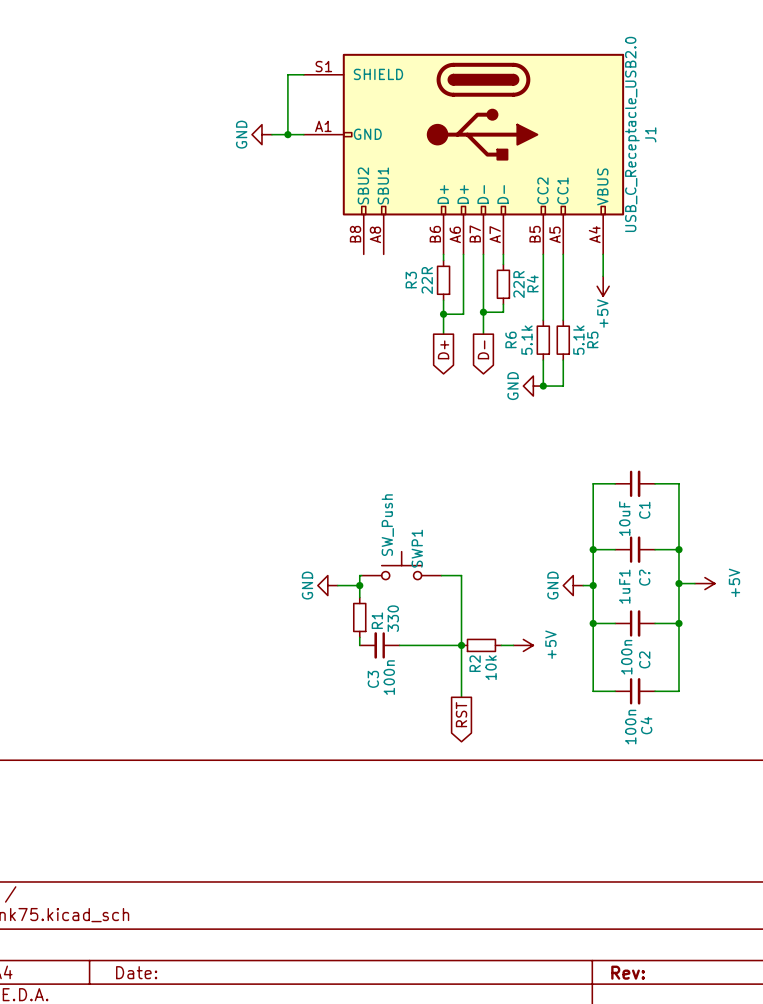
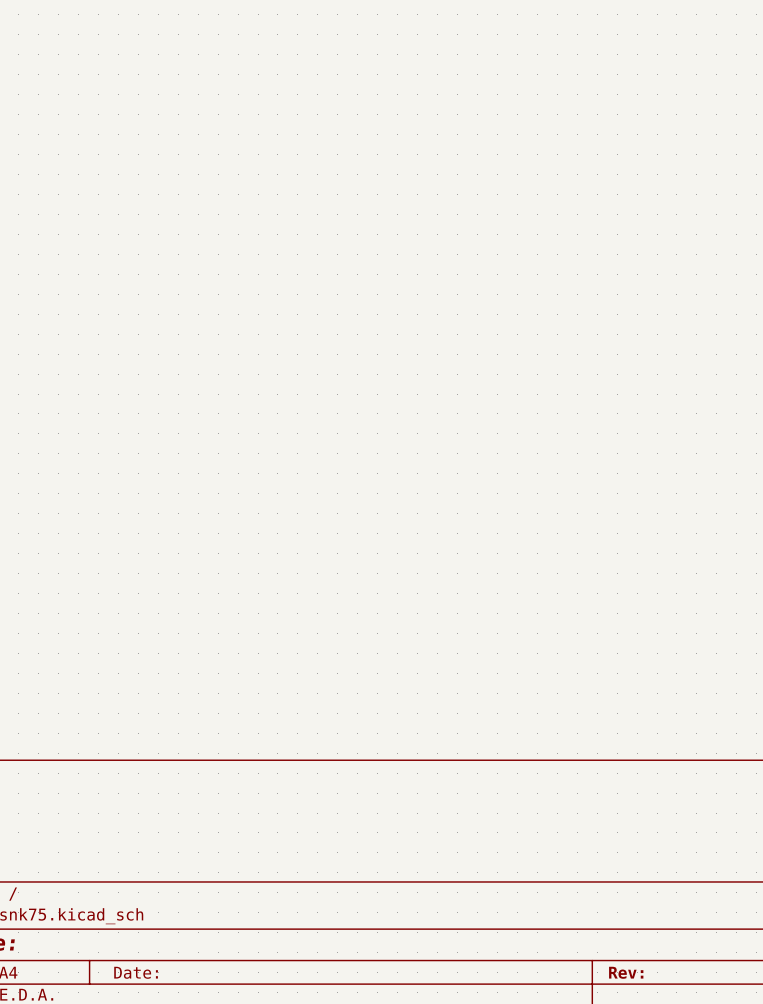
wire: (303, 74) (287, 74) (287, 134) -> none
power symbol: GND (261, 134) -> none
wire: (271, 134) (303, 134) -> none
junction: (287, 134) -> none
J1: USB_C_Receptacle_USB2.0 (464, 154) -> none
wire: (443, 254) (443, 260) -> none
wire: (463, 254) (463, 314) (443, 314) -> none
wire: (483, 254) (483, 334) -> none
wire: (503, 254) (503, 264) -> none
wire: (543, 254) (543, 320) -> none
wire: (563, 254) (563, 320) -> none
wire: (603, 254) (603, 276) -> none
R3: 22R (443, 280) -> none
R4: 22R (503, 284) -> none
power symbol: +5V (603, 286) -> none
wire: (443, 300) (443, 334) -> none
wire: (503, 304) (503, 312) (483, 312) -> none
junction: (483, 312) -> none
junction: (443, 314) -> none
R6: 5.1k (543, 340) -> none
R5: 5.1k (563, 340) -> none
global label: D+ (443, 349) -> none
global label: D- (483, 349) -> none
wire: (543, 360) (543, 386) (563, 386) (563, 360) -> none
power symbol: GND (533, 386) -> none
junction: (543, 386) -> none
wire: (615, 483) (593, 483) (593, 691) (615, 691) -> none
C1: 10uF (635, 483) -> none
wire: (655, 483) (678, 483) (678, 691) (655, 691) -> none
wire: (593, 549) (615, 549) -> none
junction: (593, 549) -> none
1uF1: C? (635, 549) -> none
wire: (655, 549) (678, 549) -> none
junction: (678, 549) -> none
SWP1: SW_Push (401, 565) -> none
wire: (361, 575) (359, 575) (359, 597) -> none
wire: (441, 575) (461, 575) (461, 697) -> none
wire: (678, 583) (694, 583) -> none
junction: (678, 583) -> none
power symbol: +5V (704, 583) -> none
power symbol: GND (327, 585) -> none
wire: (337, 585) (359, 585) -> none
junction: (359, 585) -> none
power symbol: GND (573, 585) -> none
wire: (583, 585) (593, 585) -> none
junction: (593, 585) -> none
R1: 330 (359, 617) -> none
wire: (593, 623) (615, 623) -> none
junction: (593, 623) -> none
C2: 100n (635, 623) -> none
wire: (655, 623) (678, 623) -> none
junction: (678, 623) -> none
wire: (359, 637) (359, 645) -> none
C3: 100n (379, 645) -> none
wire: (399, 645) (461, 645) -> none
junction: (461, 645) -> none
R2: 10k (481, 645) -> none
wire: (501, 645) (513, 645) -> none
power symbol: +5V (523, 645) -> none
C4: 100n (635, 691) -> none
global label: RST (461, 714) -> none

